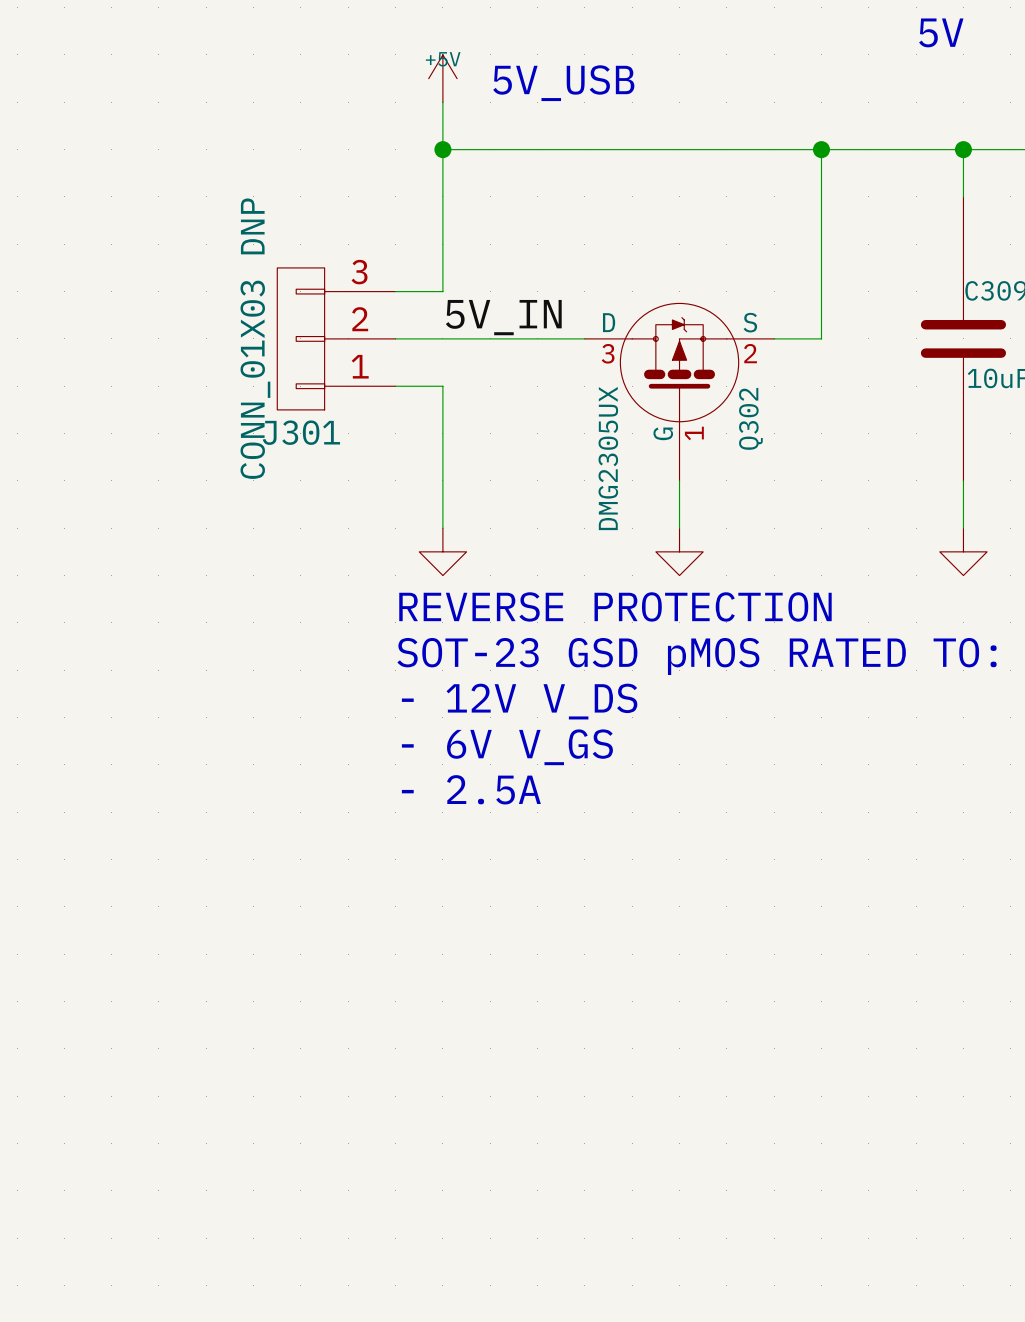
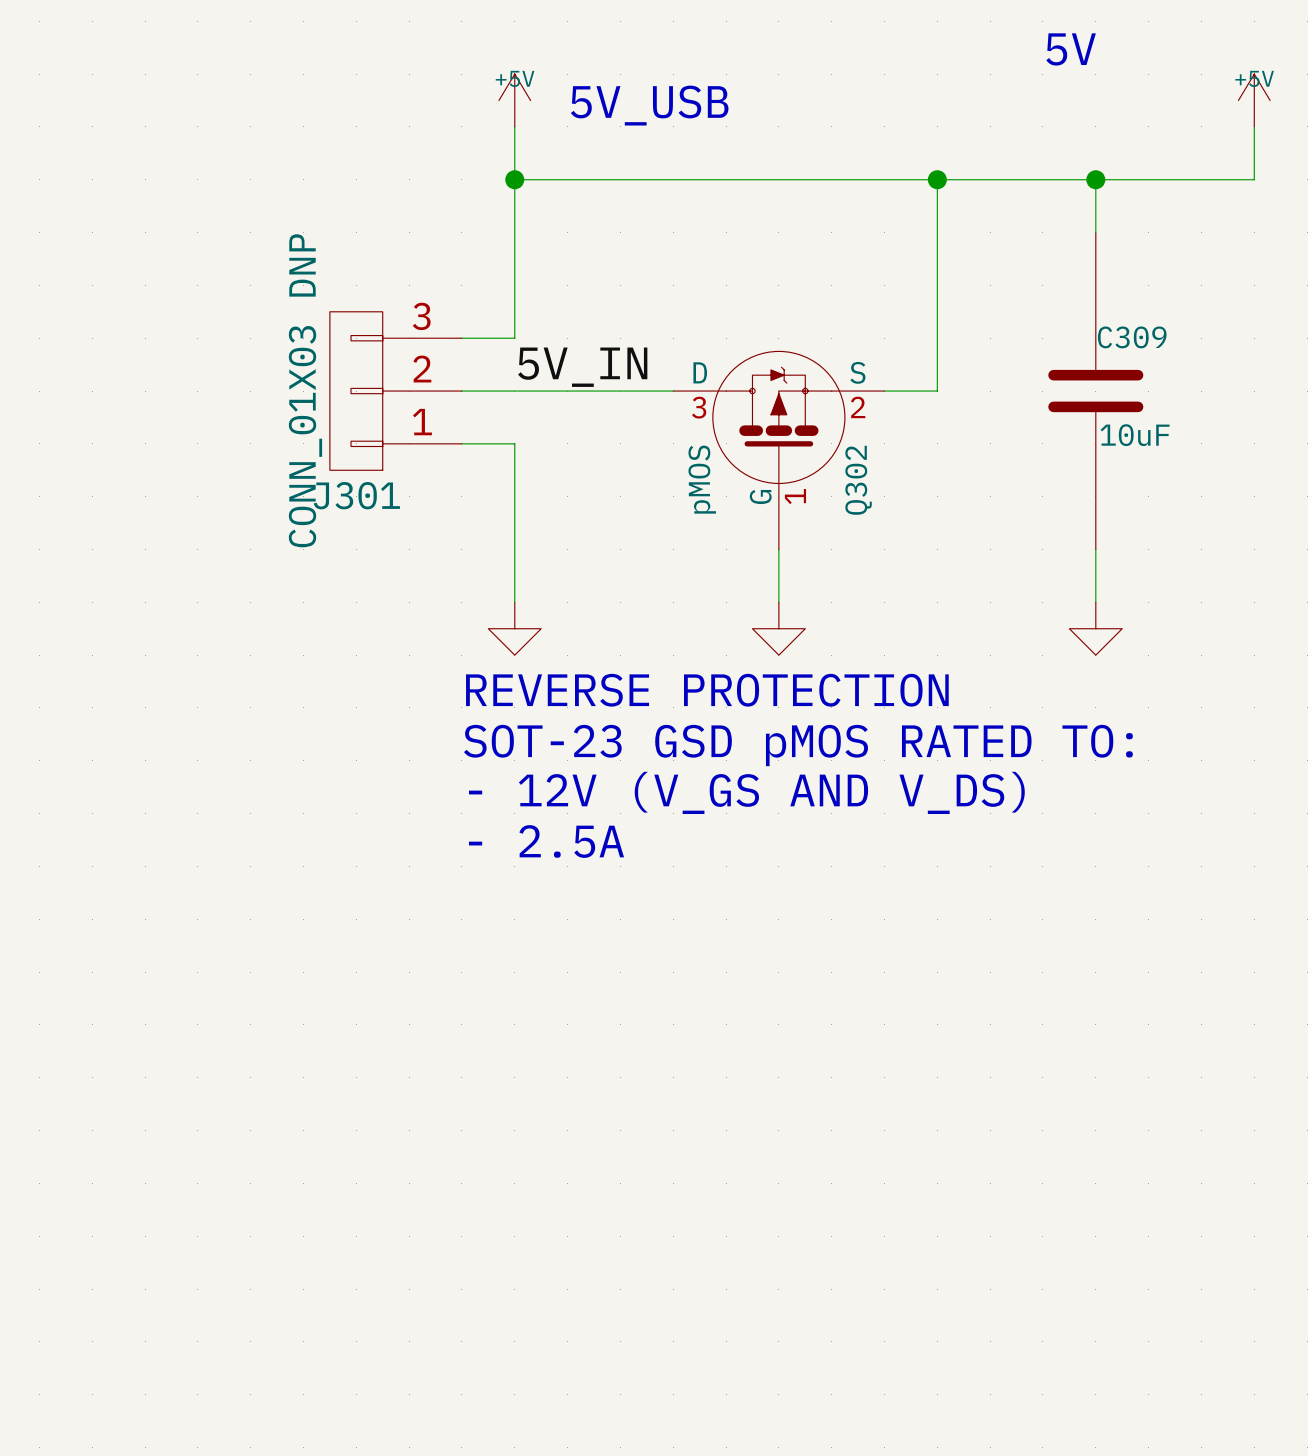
Q302 value: DMG2305UX (608, 458) -> pMOS (702, 479)
text: - 12V V_DS (519, 701) -> - 12V (V_GS AND V_DS) (746, 792)
text: - 6V V_GS (507, 747) -> - 2.5A (546, 841)
text: - 2.5A (471, 789) -> none

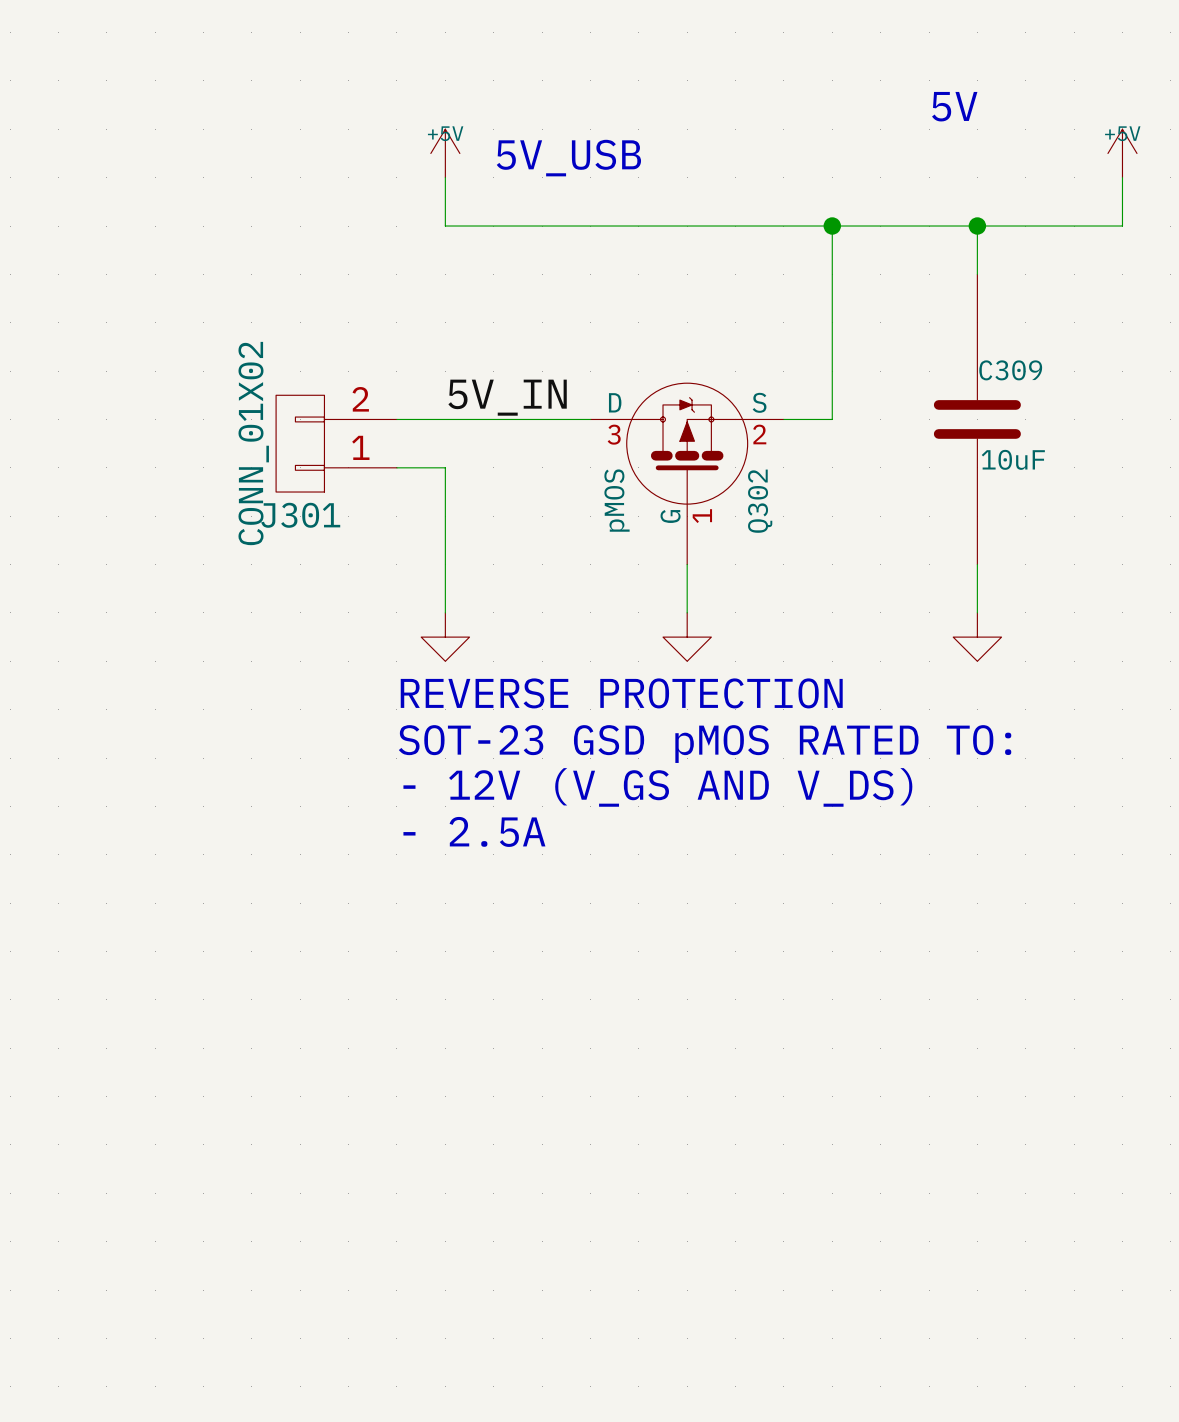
wire: (514, 179) (514, 338) (461, 338) -> none
junction: (514, 179) -> none
J301 symbol: [329, 311, 462, 471] -> [276, 395, 397, 493]
J301 value: CONN_01X03 DNP (305, 390) -> CONN_01X02 (253, 443)

